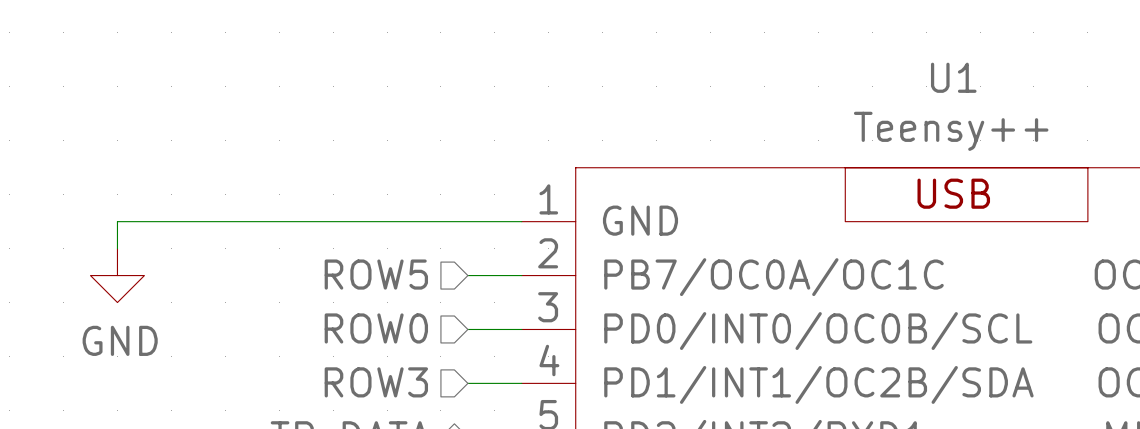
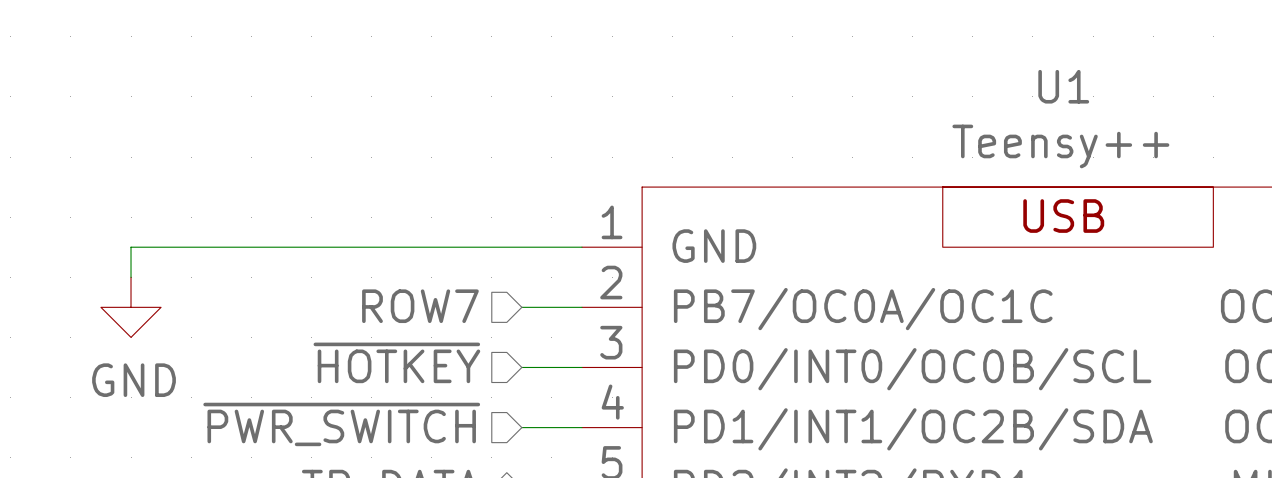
hierarchical label: ROW5 (376, 274) -> ROW7 (420, 306)
hierarchical label: ROW0 (376, 328) -> ~{HOTKEY} (396, 362)
hierarchical label: ROW3 (376, 382) -> ~{PWR_SWITCH} (341, 424)

